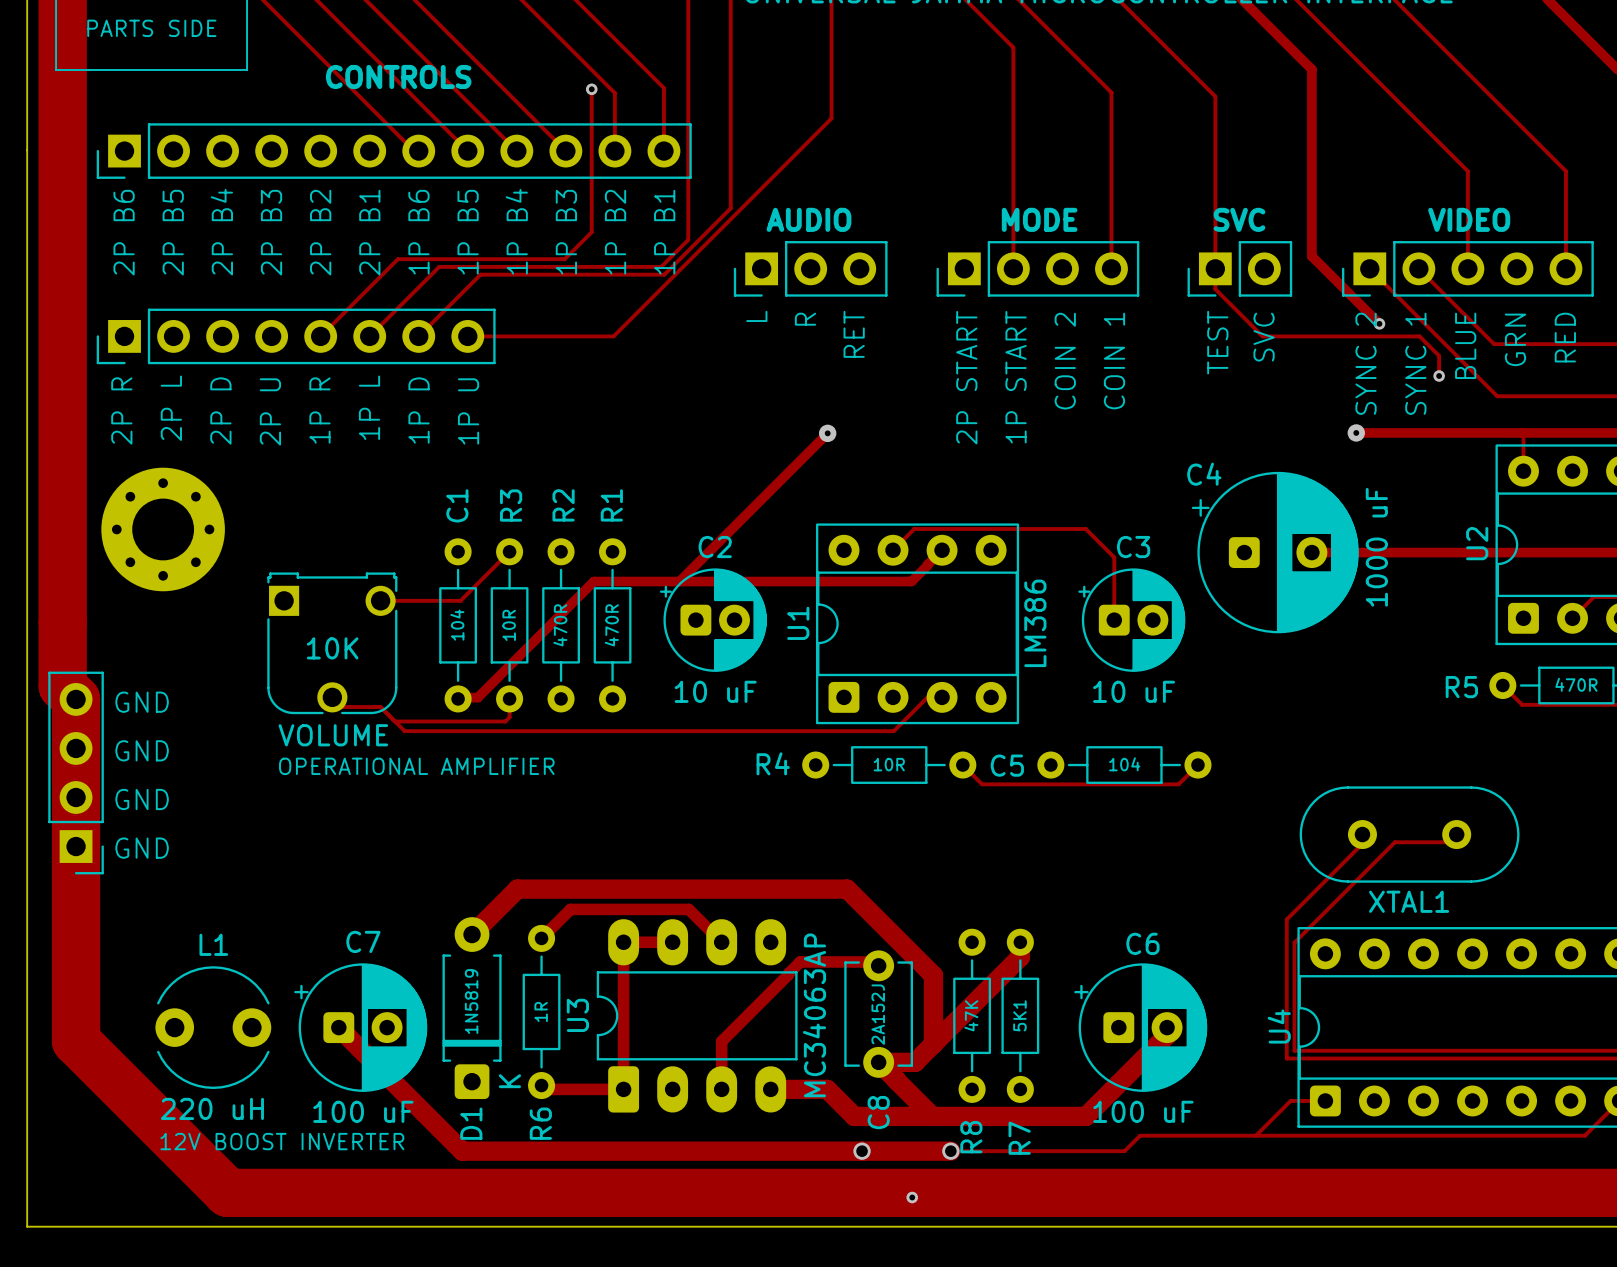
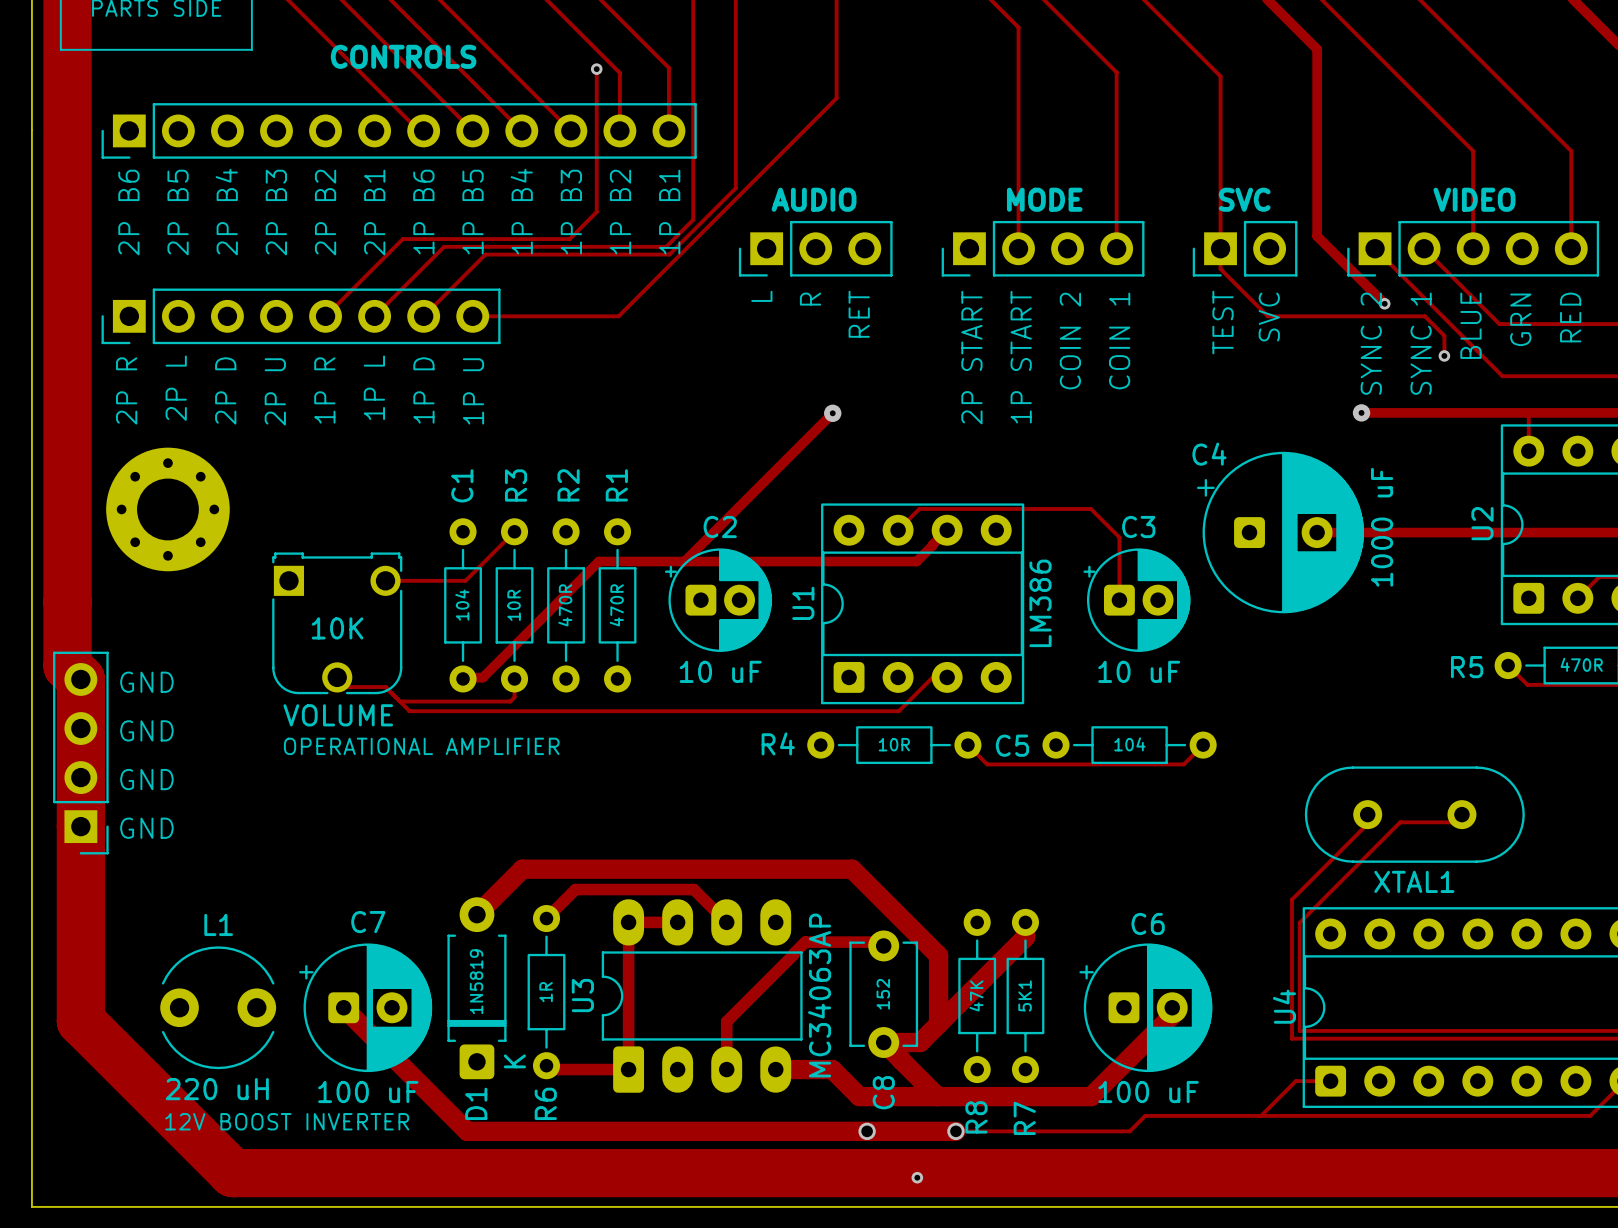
C8 value: 2A152J (878, 1014) -> 152 (883, 994)

